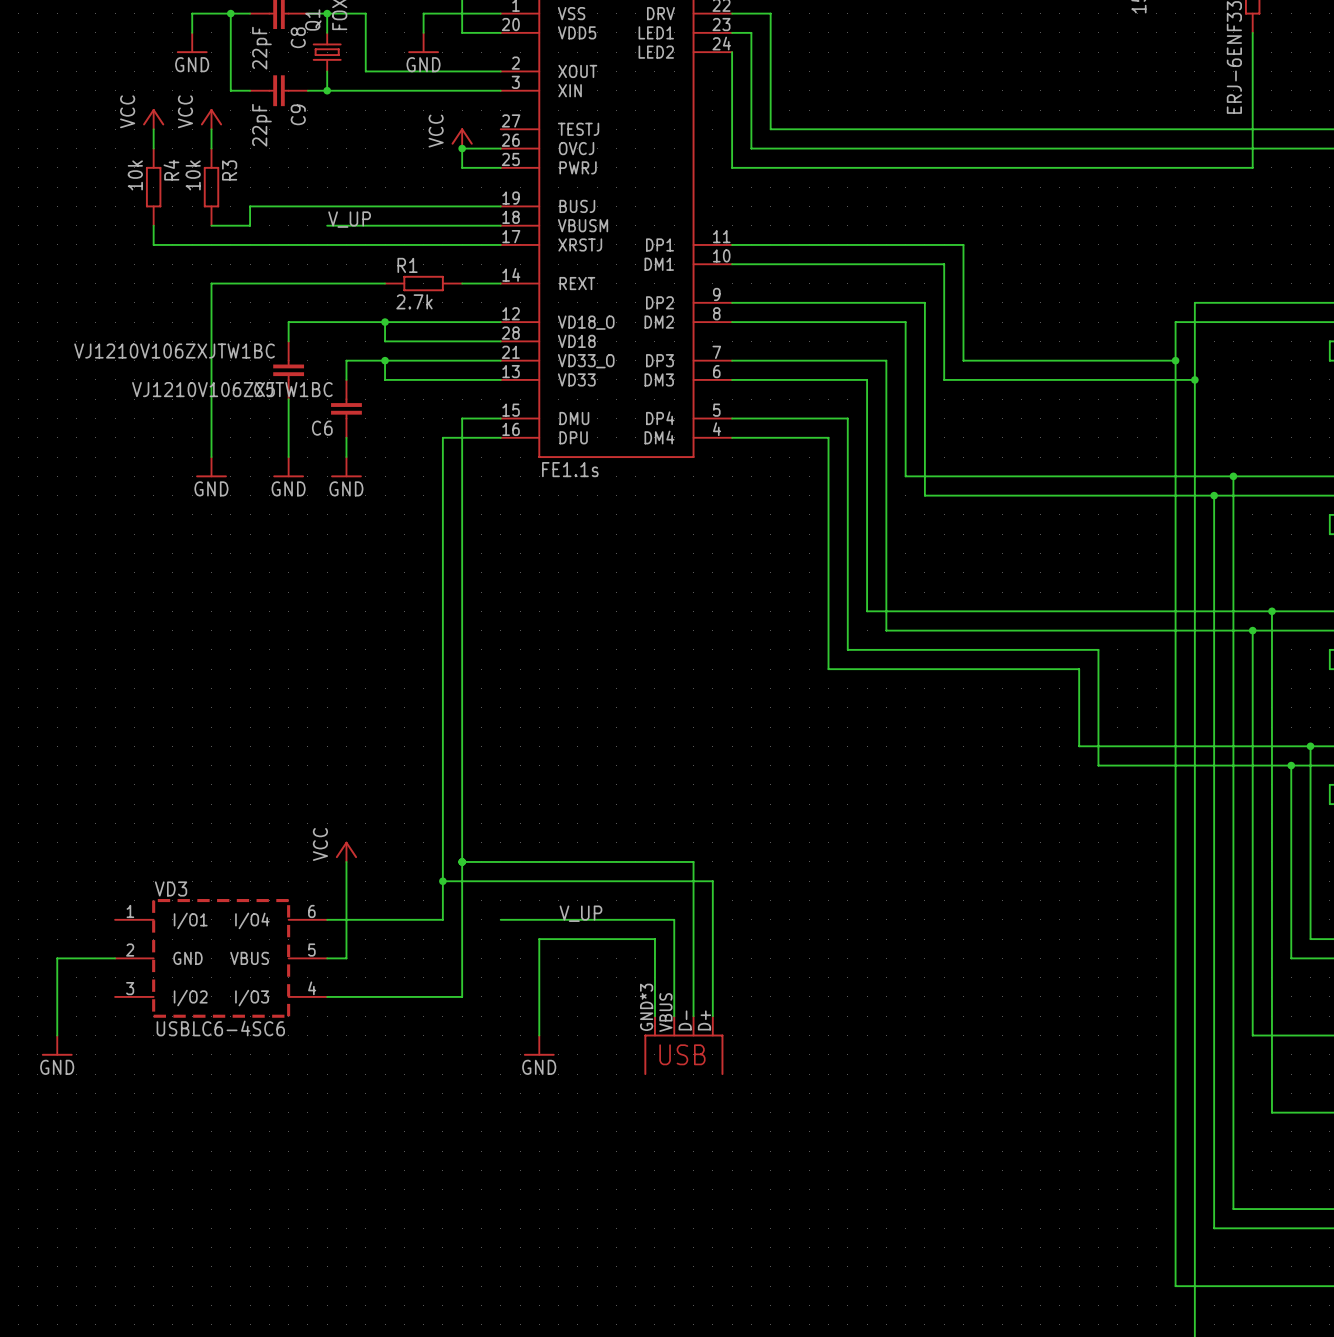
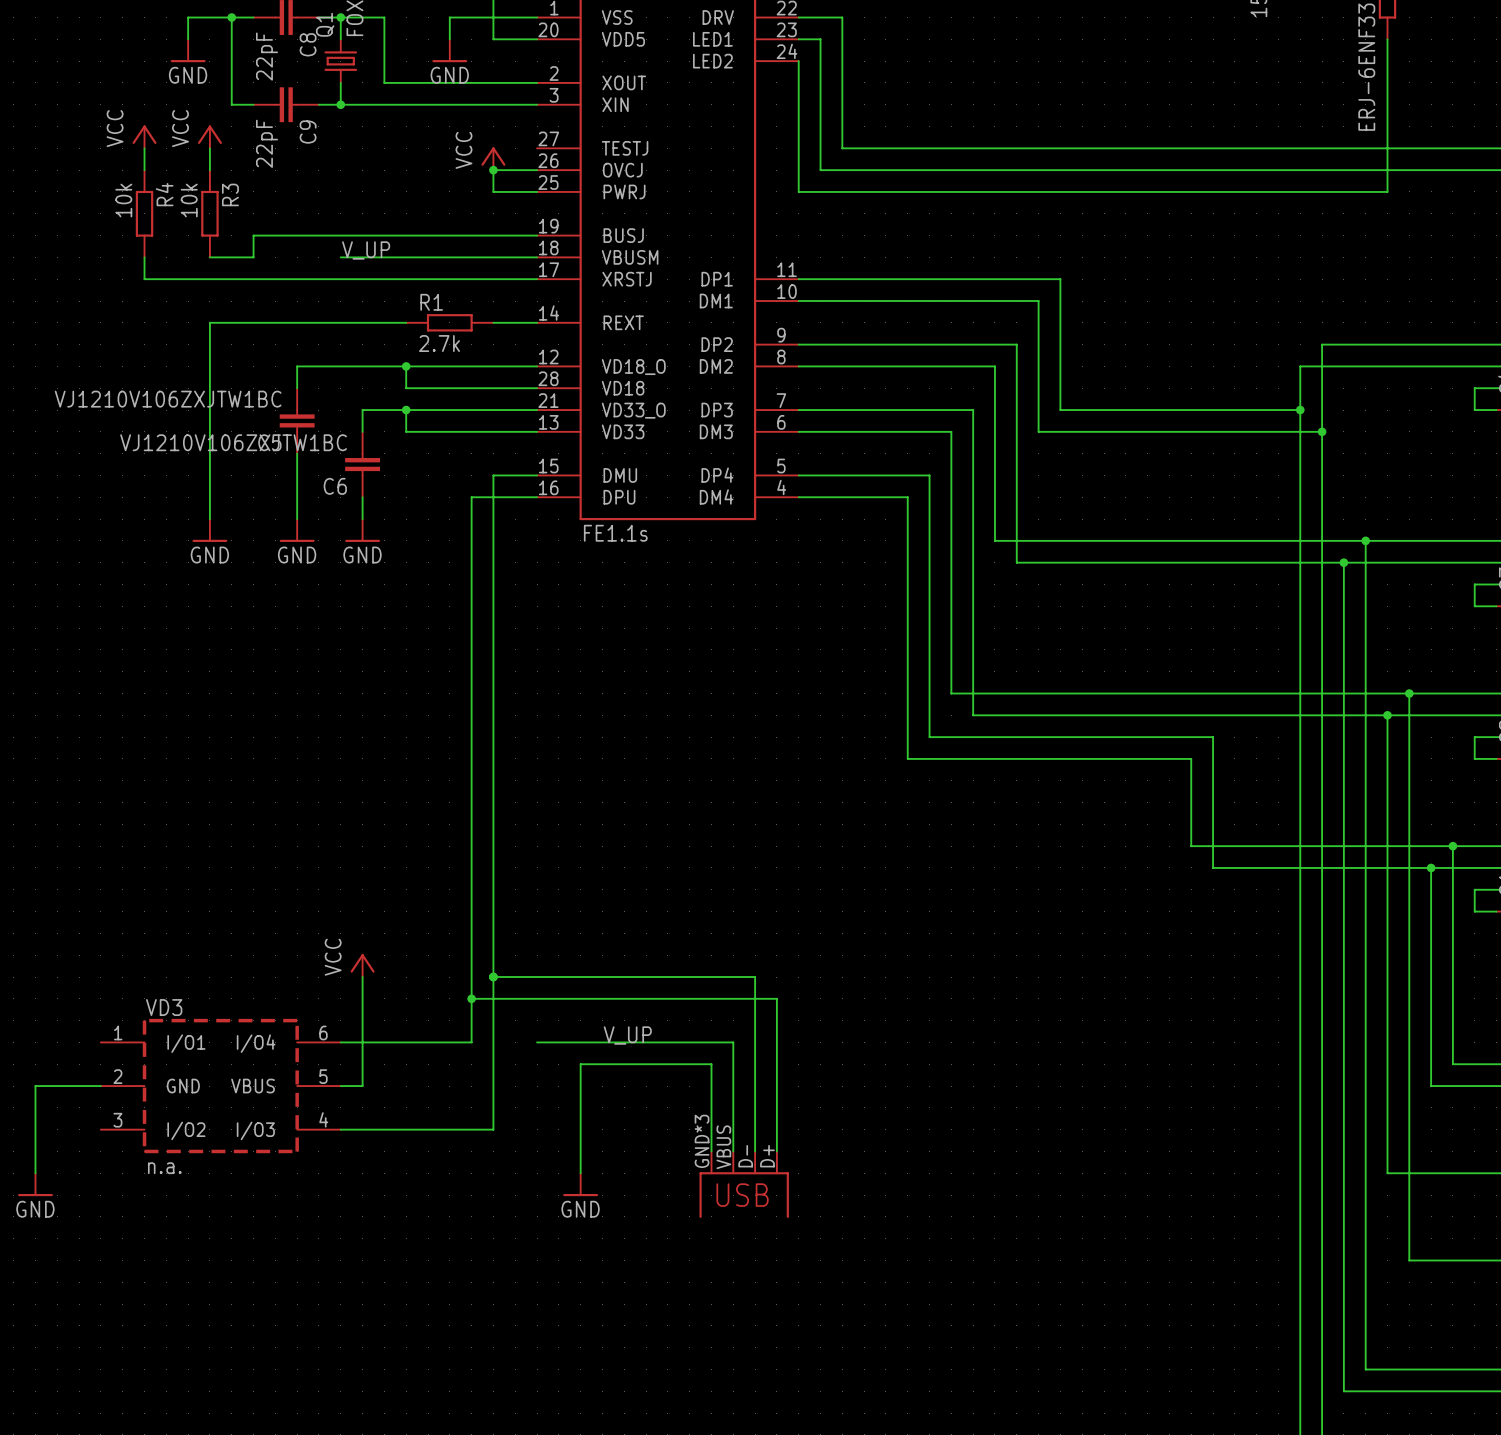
VD3 value: USBLC6-4SC6 (220, 1028) -> n.a. (164, 1168)

